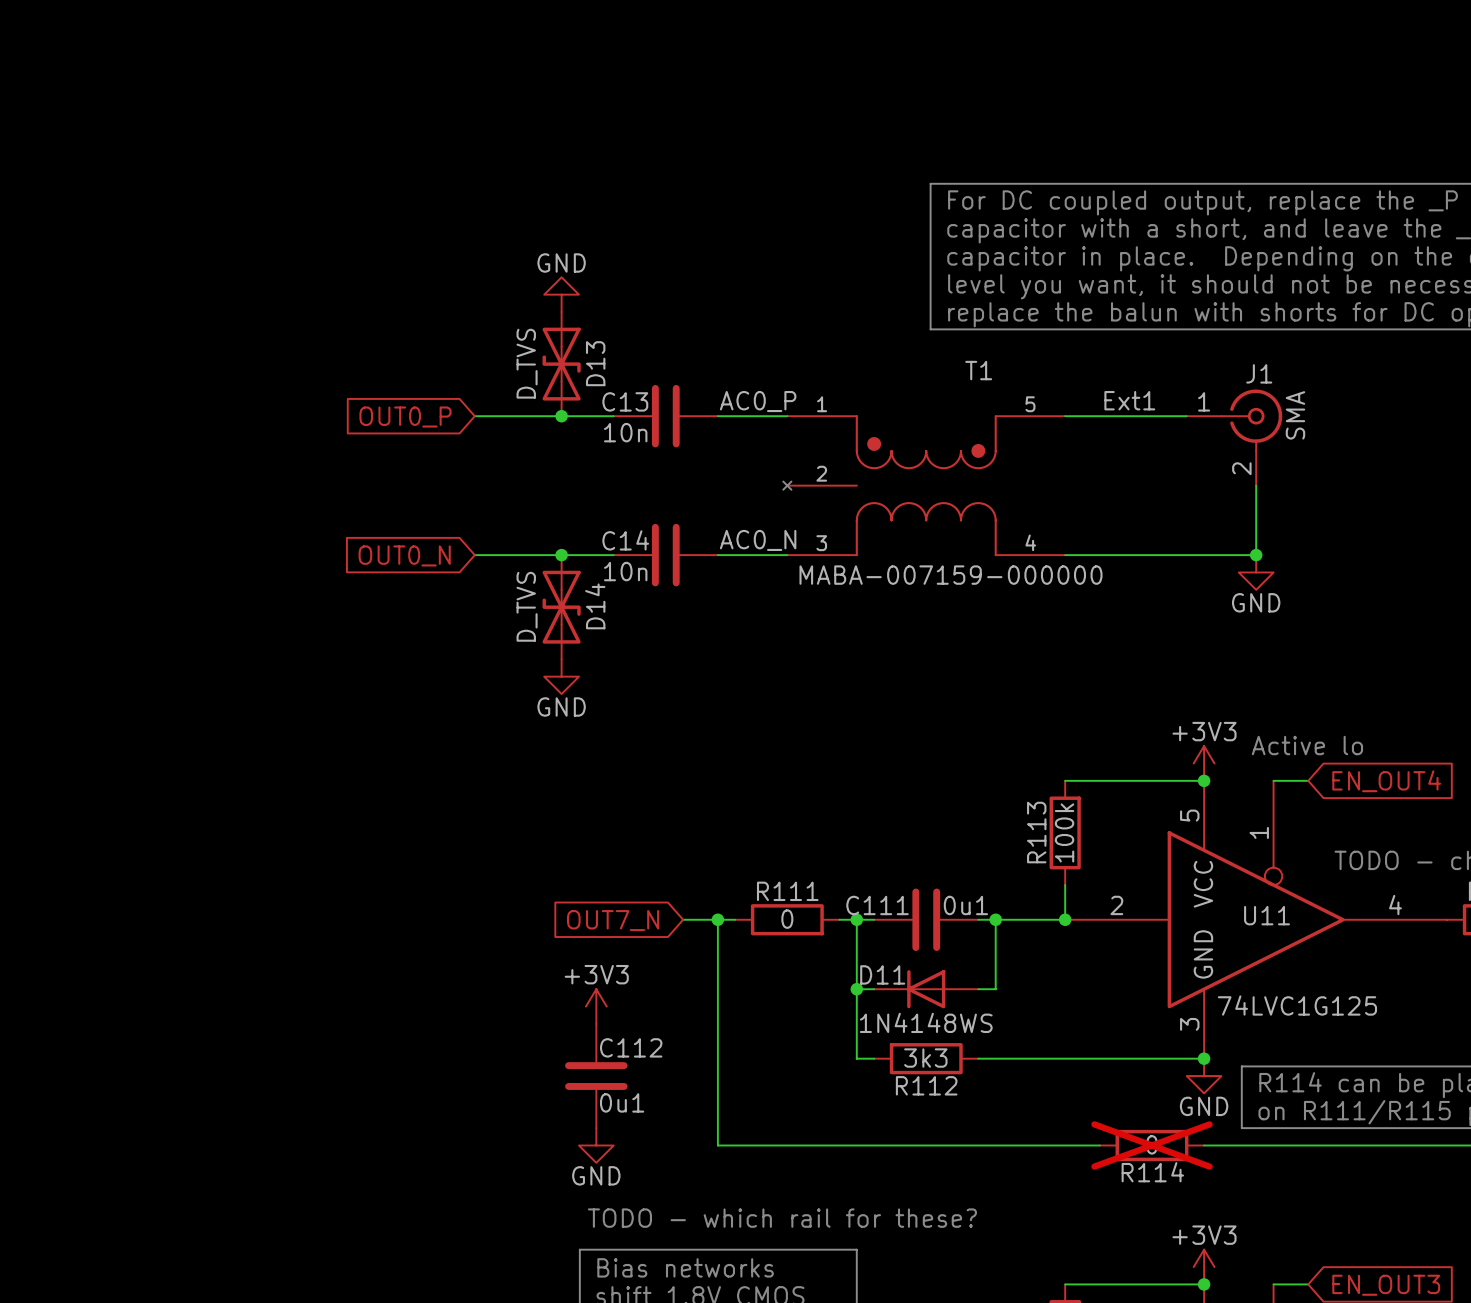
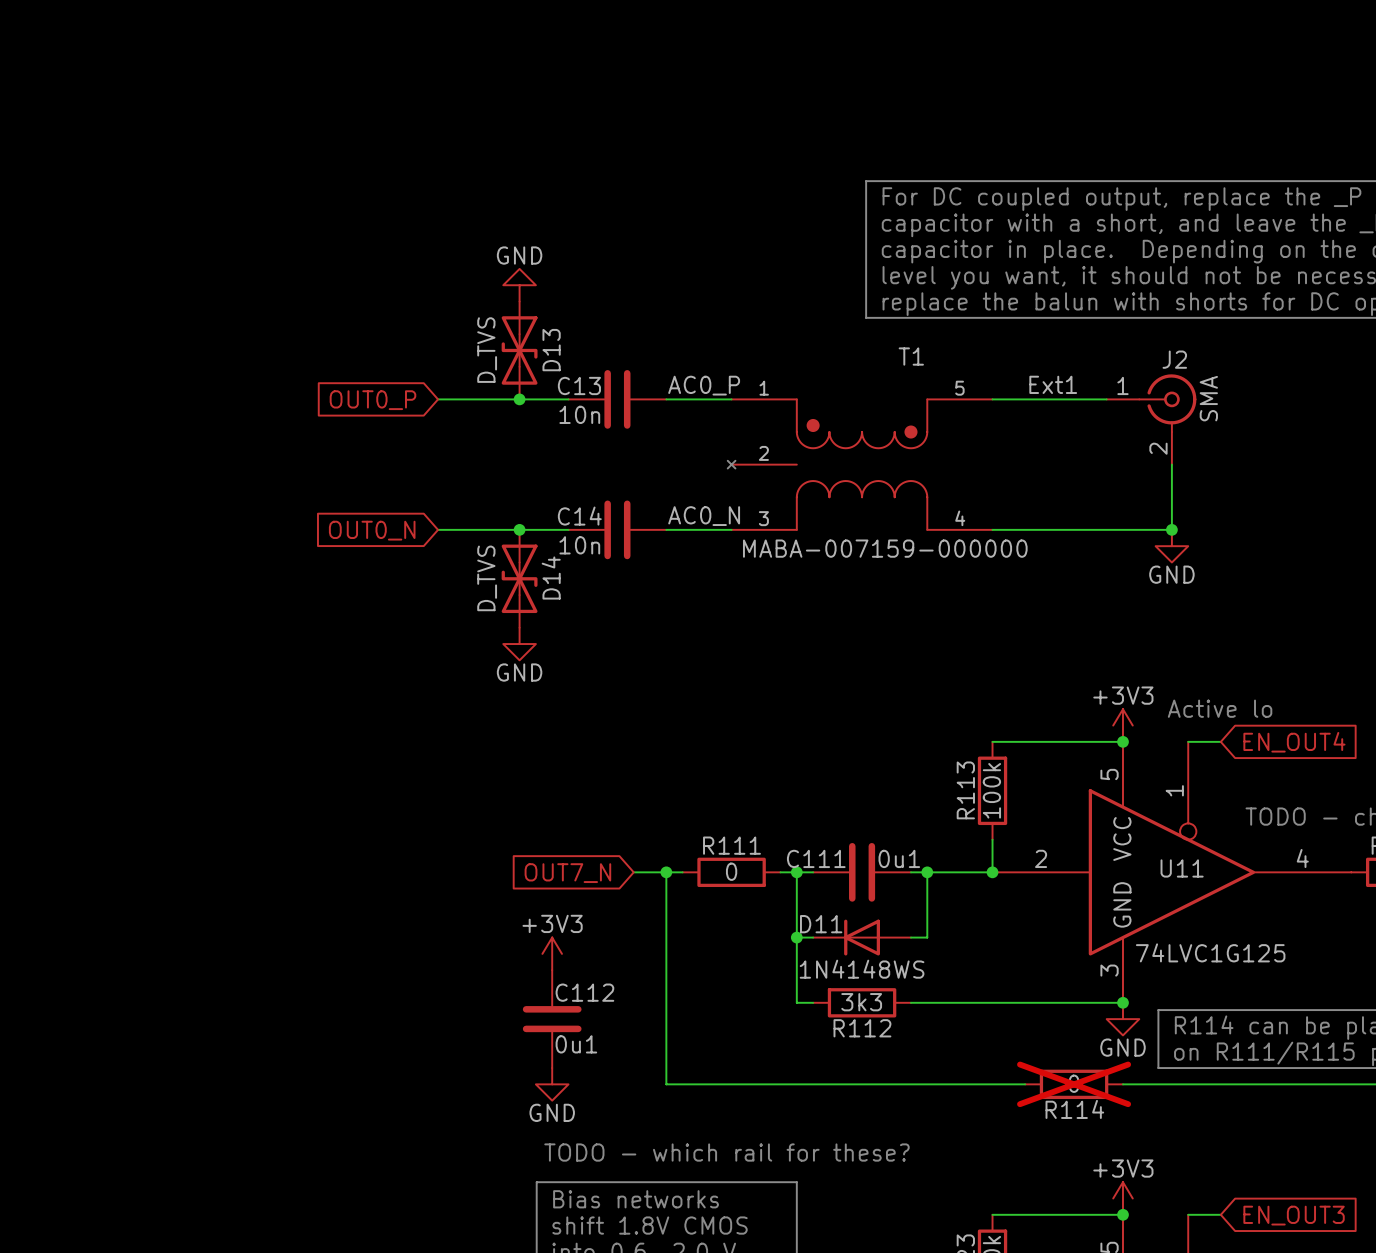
J1 name: J1 (1259, 373) -> J2 (1174, 359)

